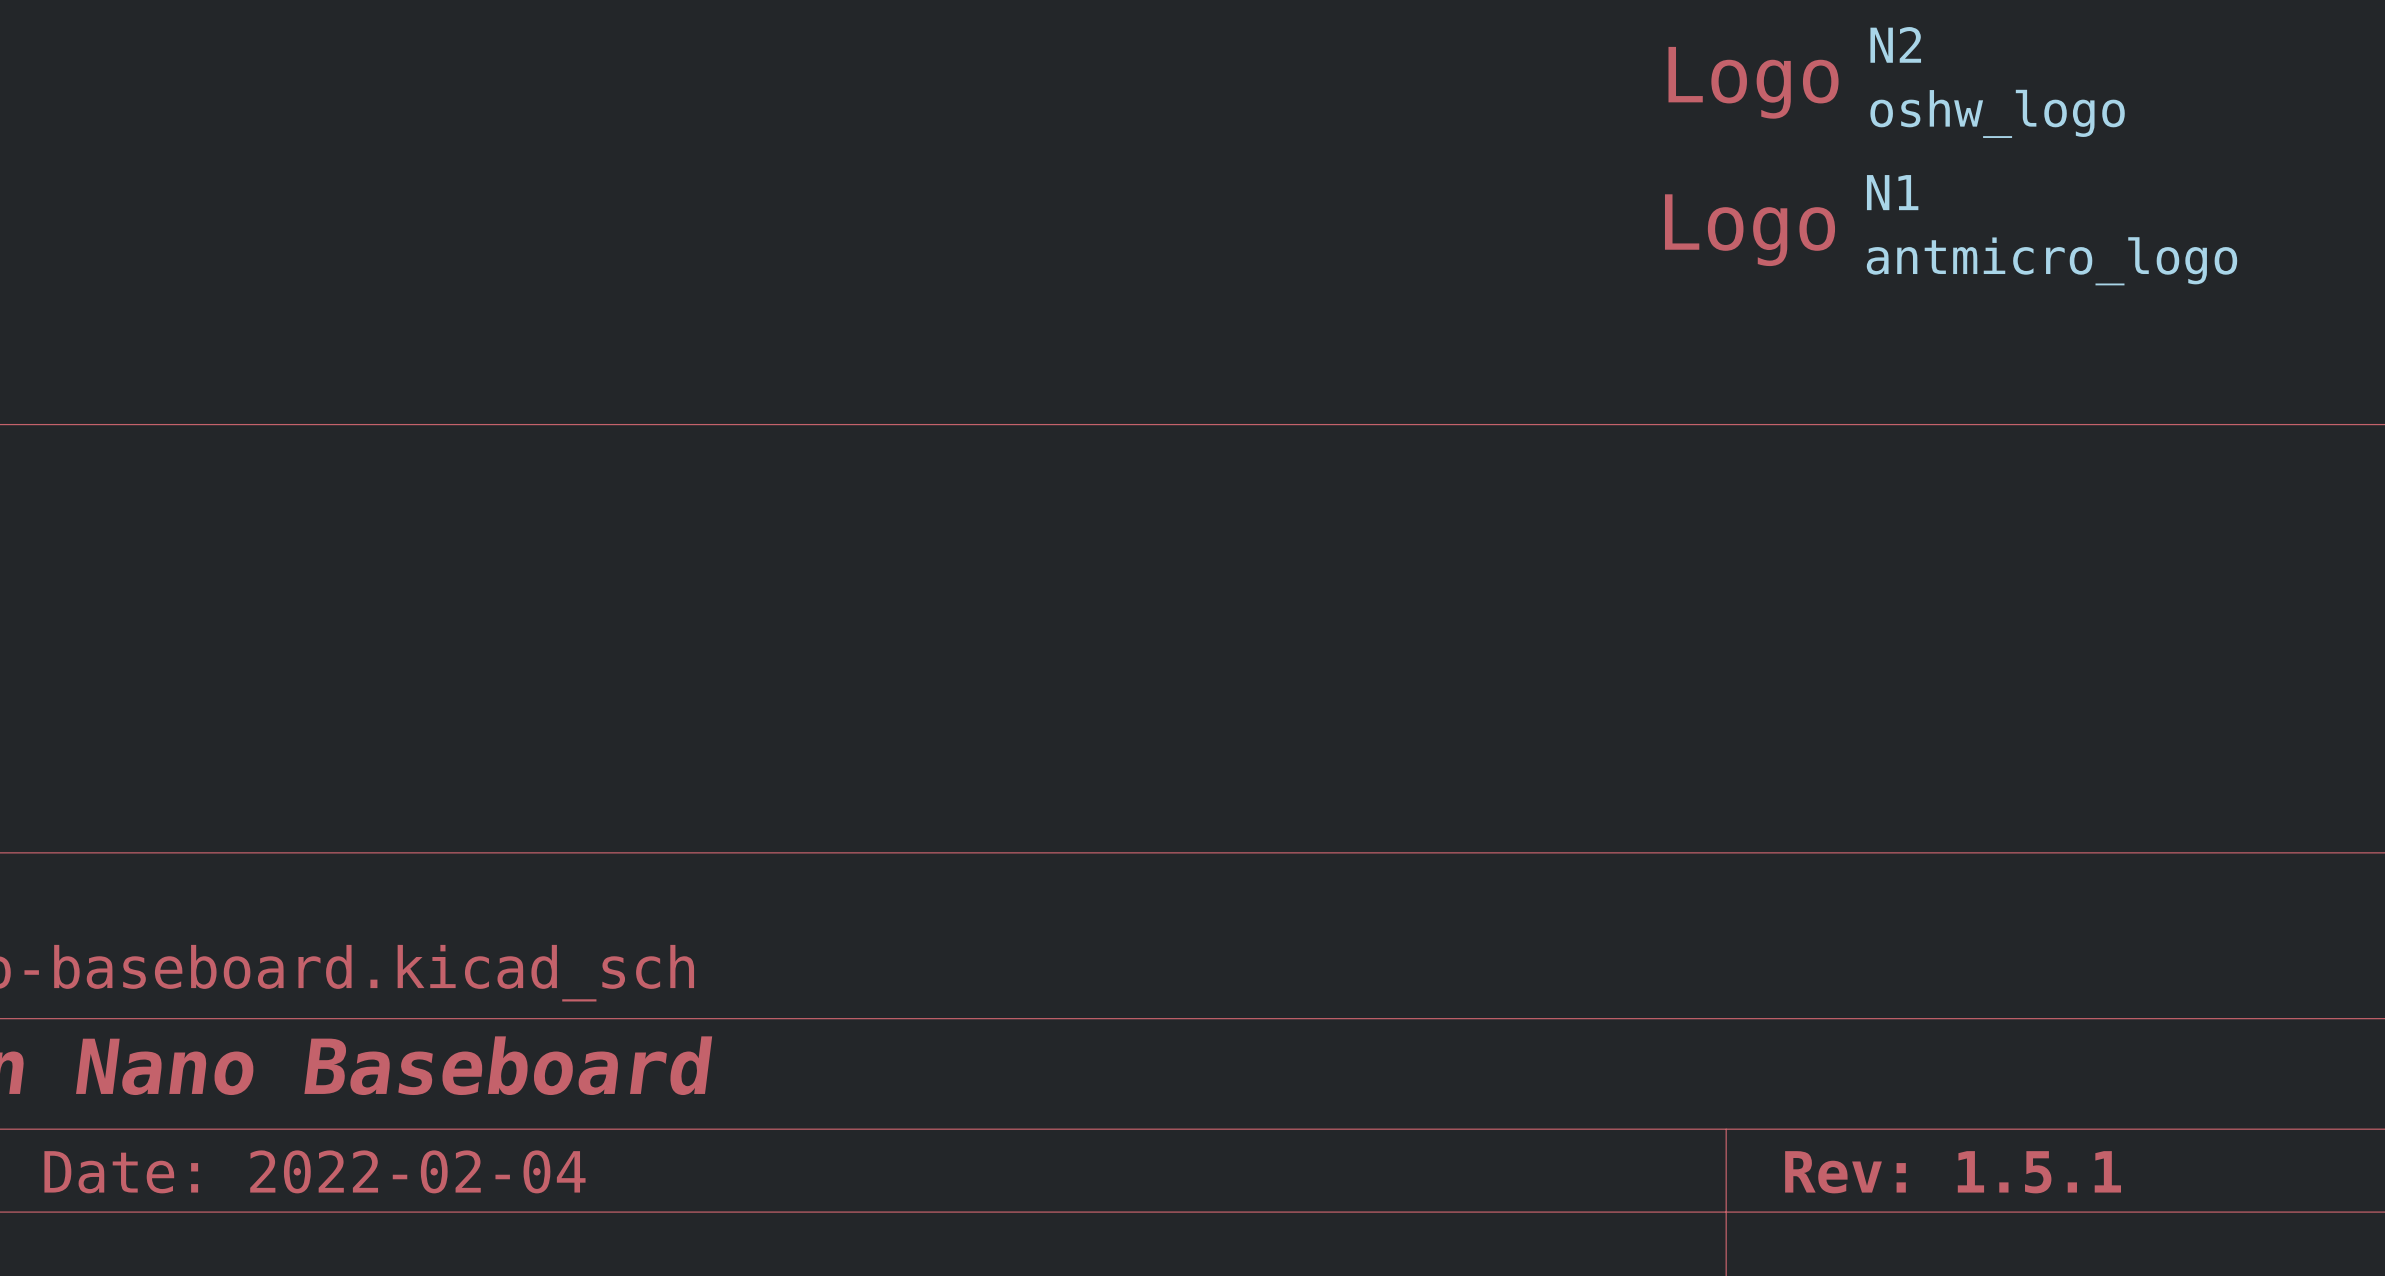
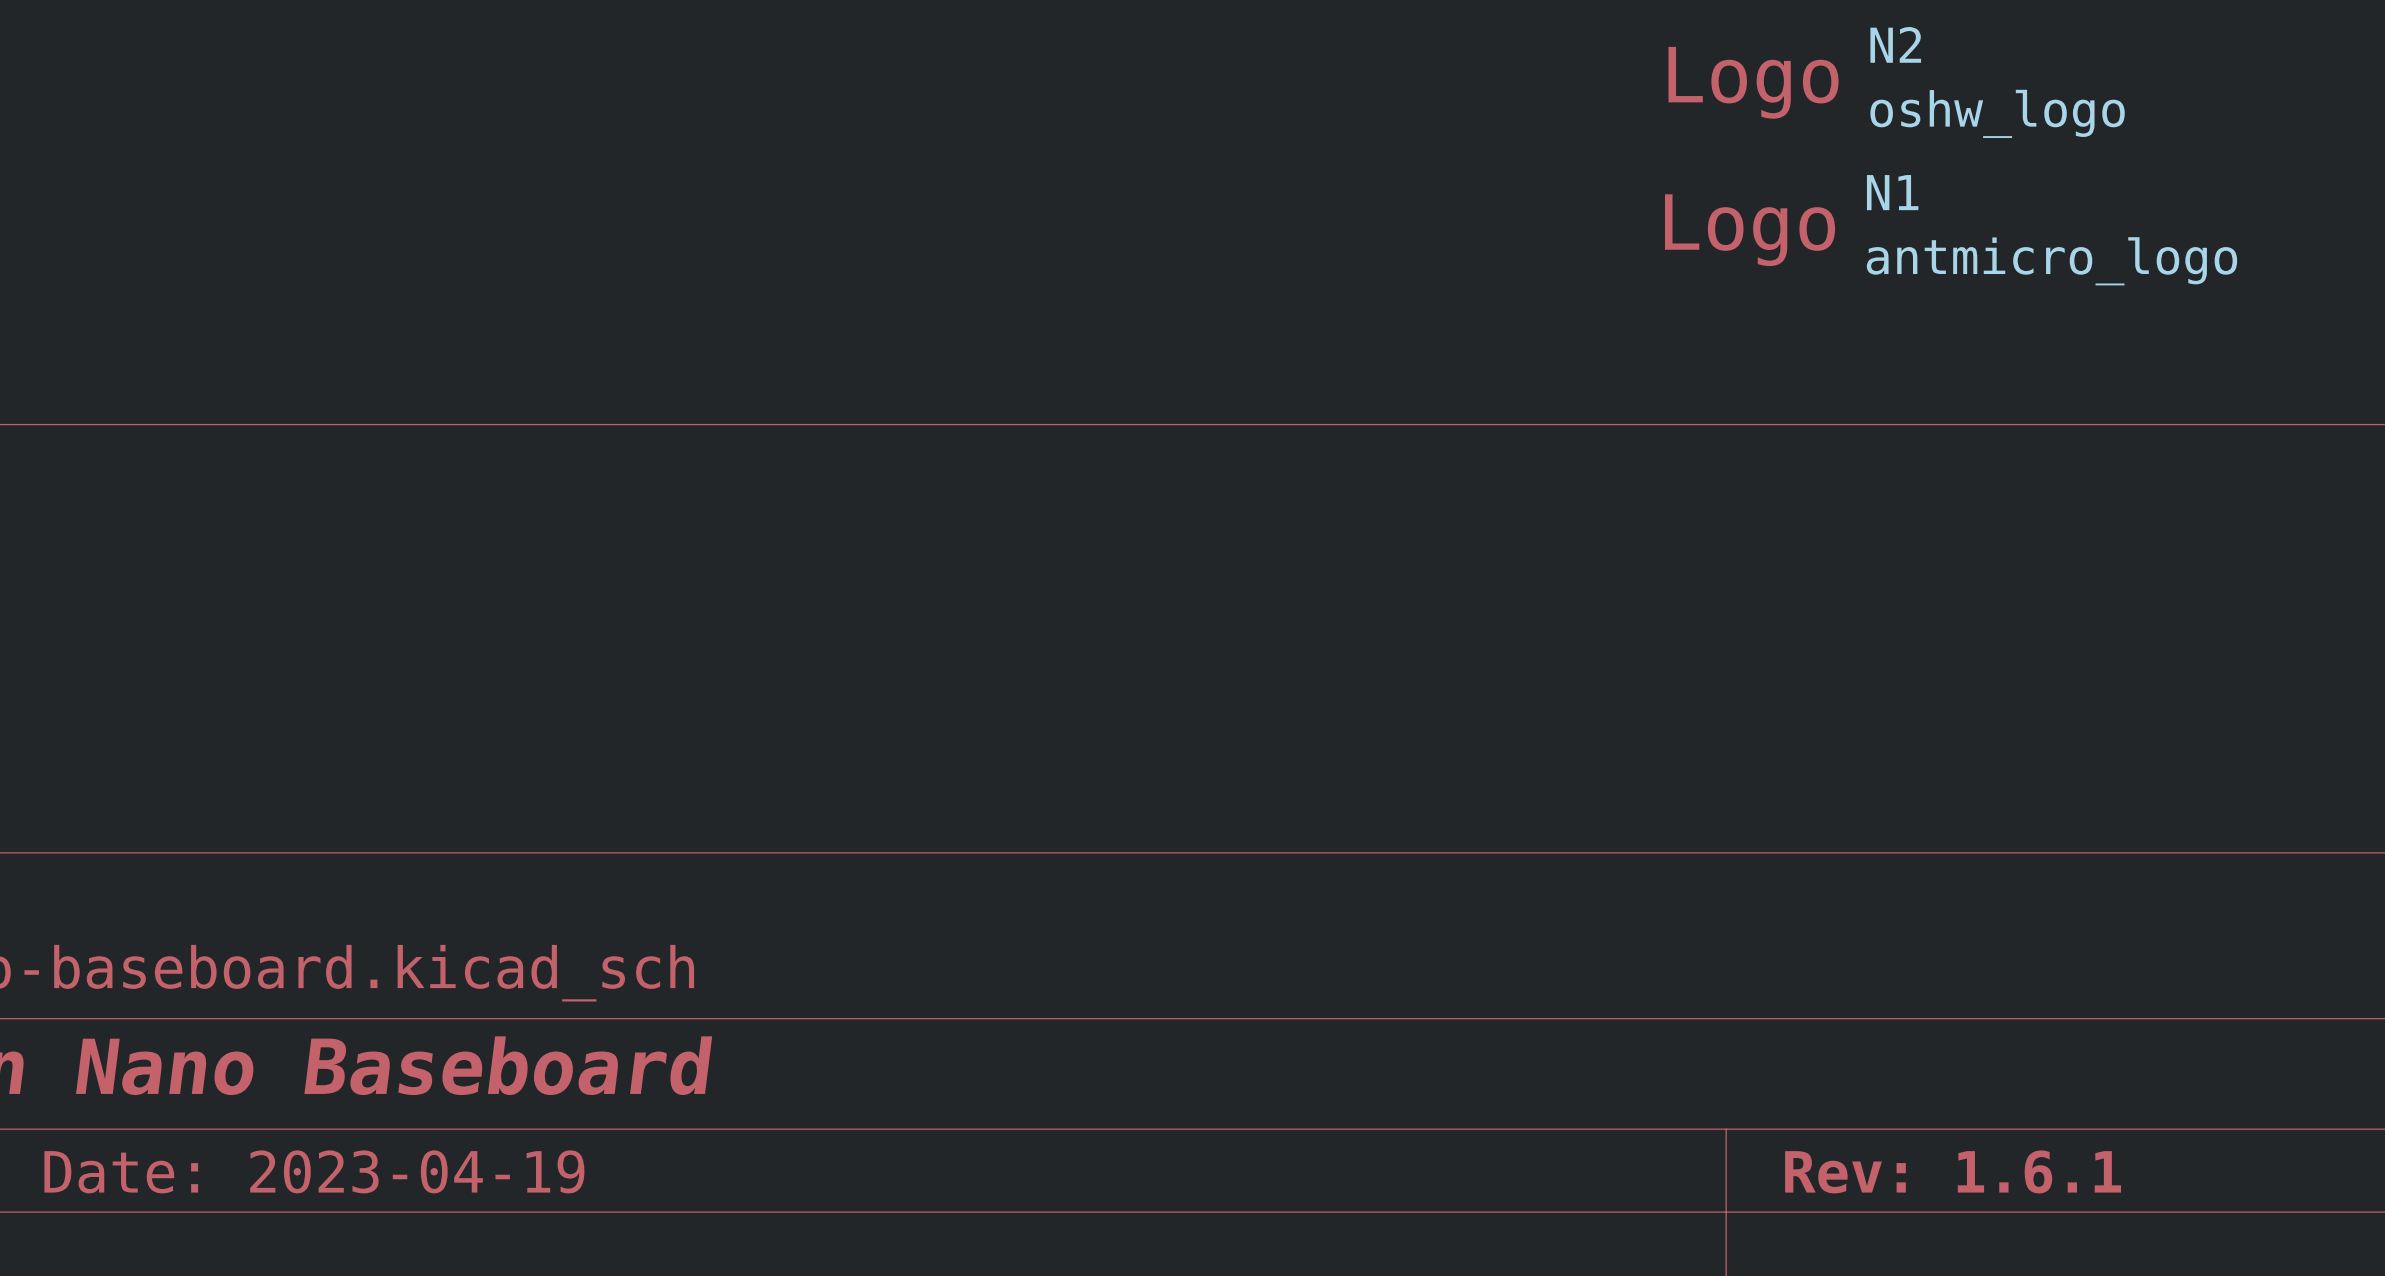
title block: Date: 2022-02-04 (314, 1171) -> Date: 2023-04-19 (314, 1171)
title block: Rev: 1.5.1 (1953, 1172) -> Rev: 1.6.1 (1953, 1171)

